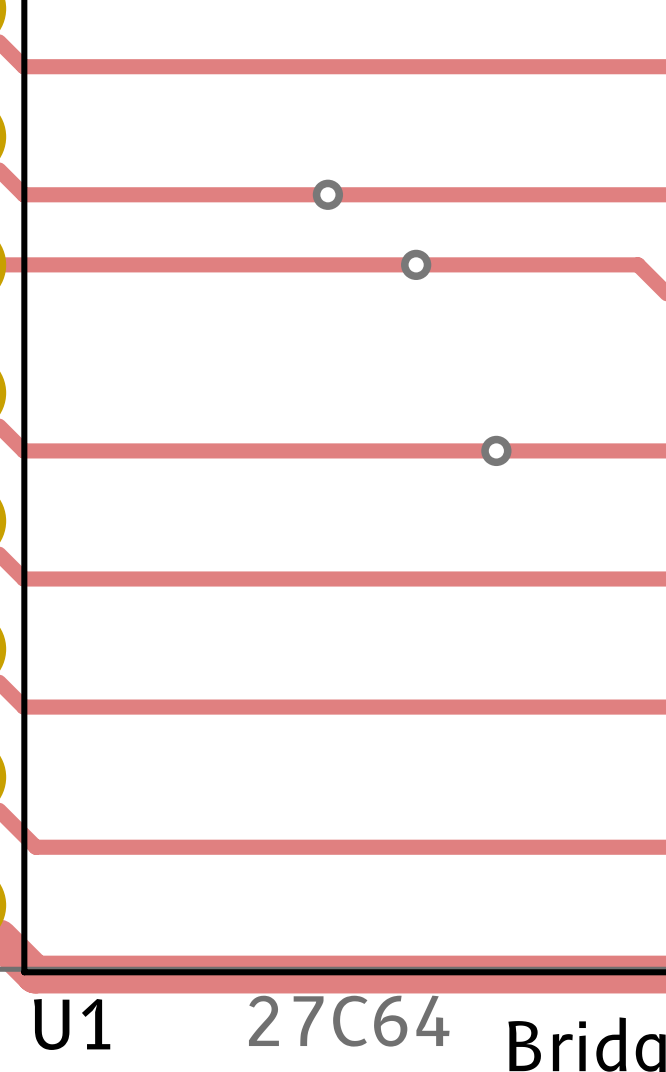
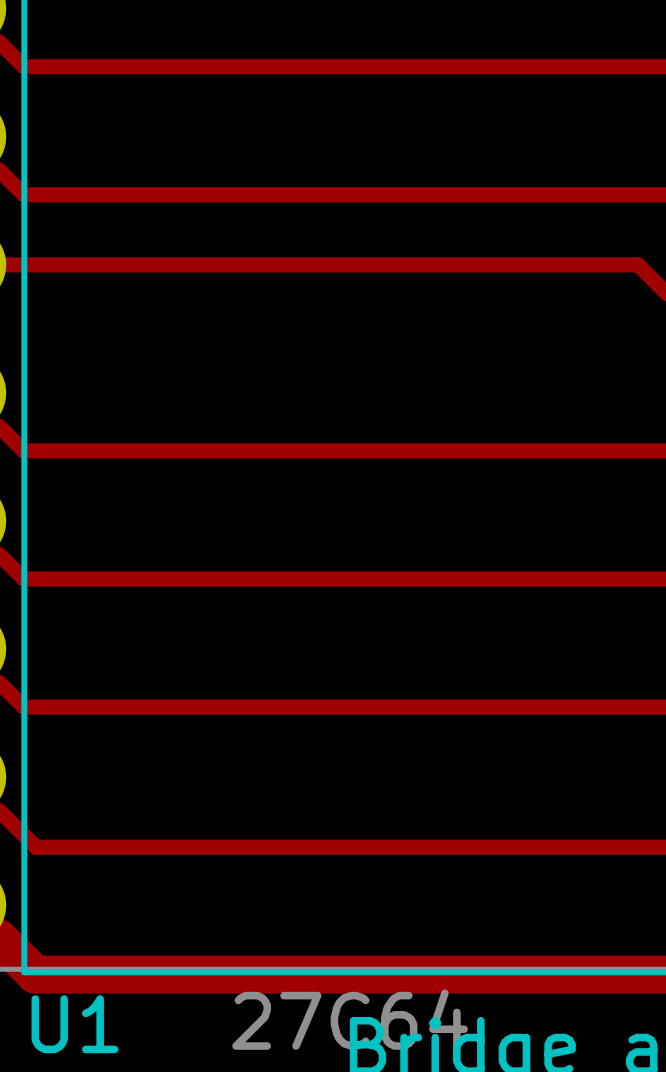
via: (327, 194) -> none
via: (416, 264) -> none
via: (496, 450) -> none

